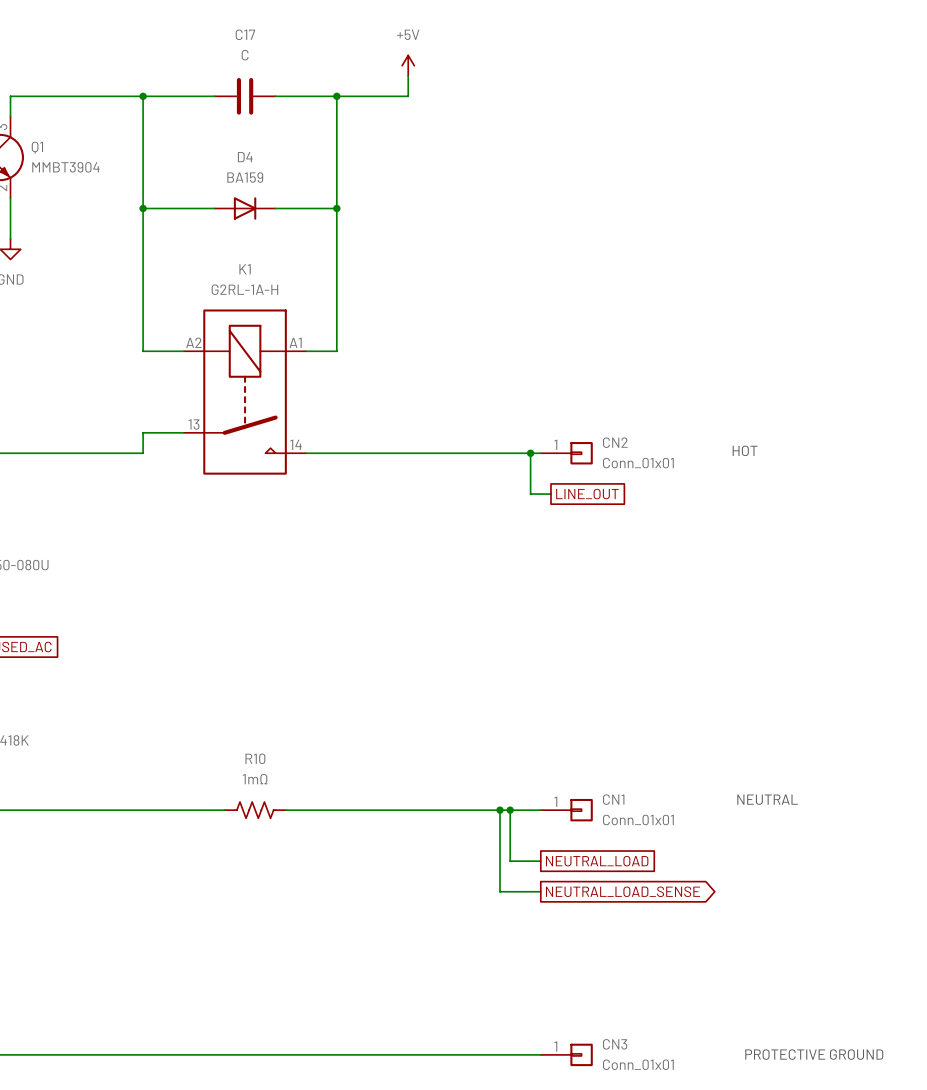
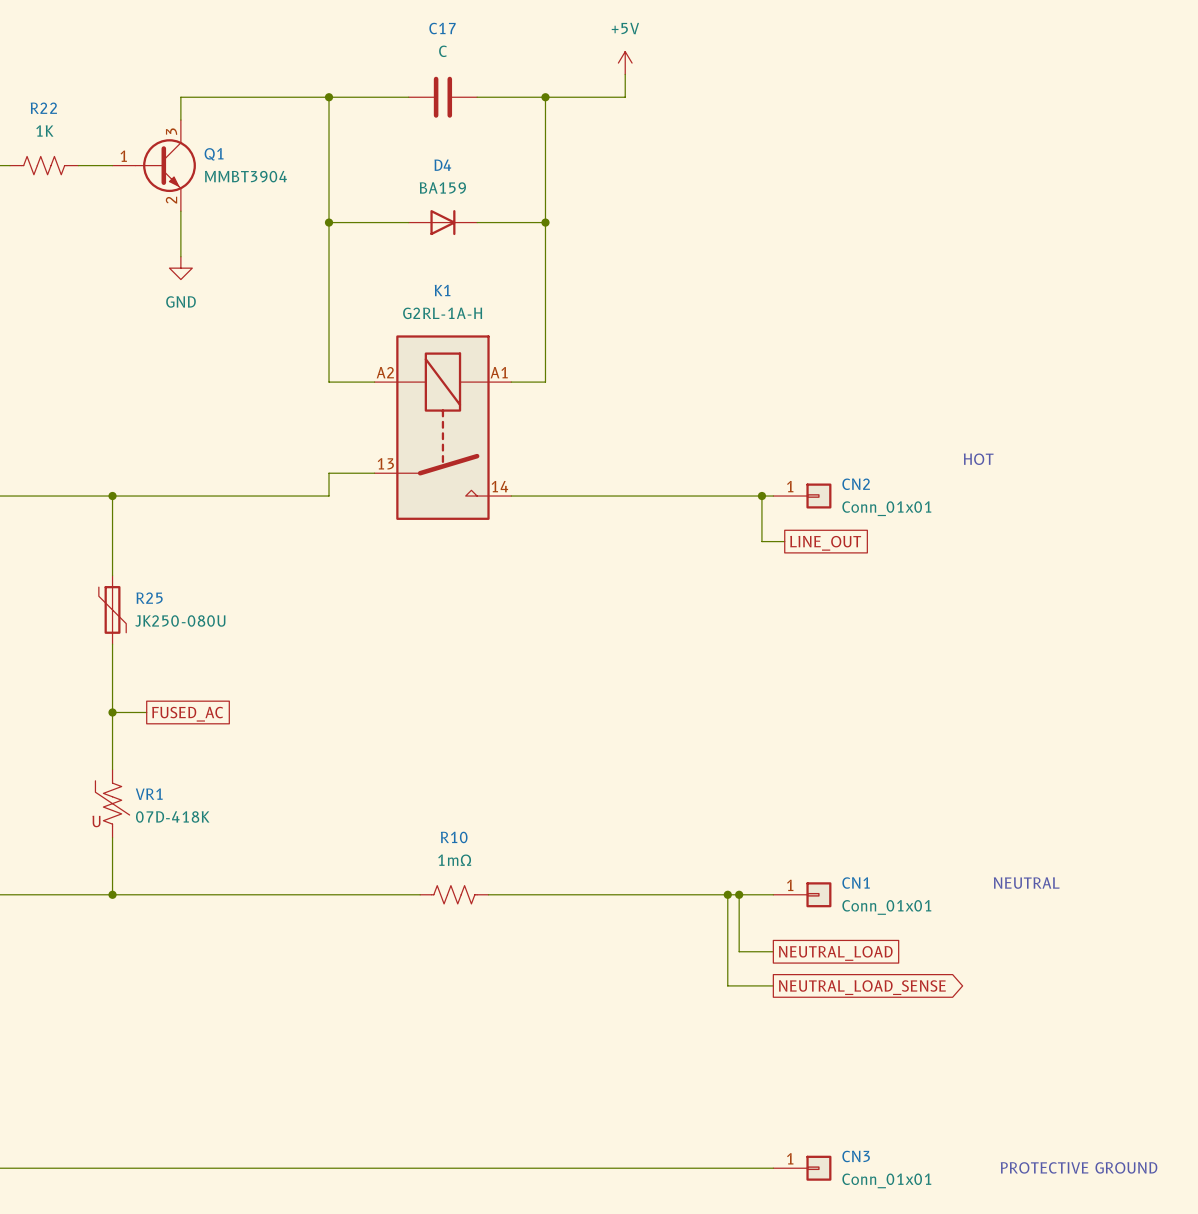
text position: HOT (745, 450) -> HOT (978, 459)

